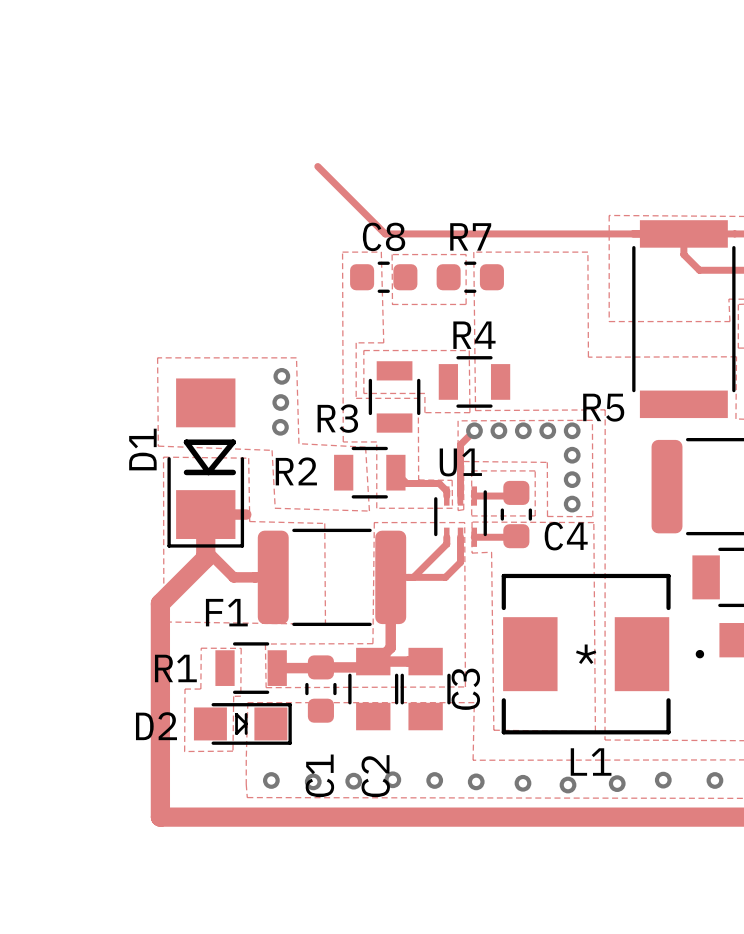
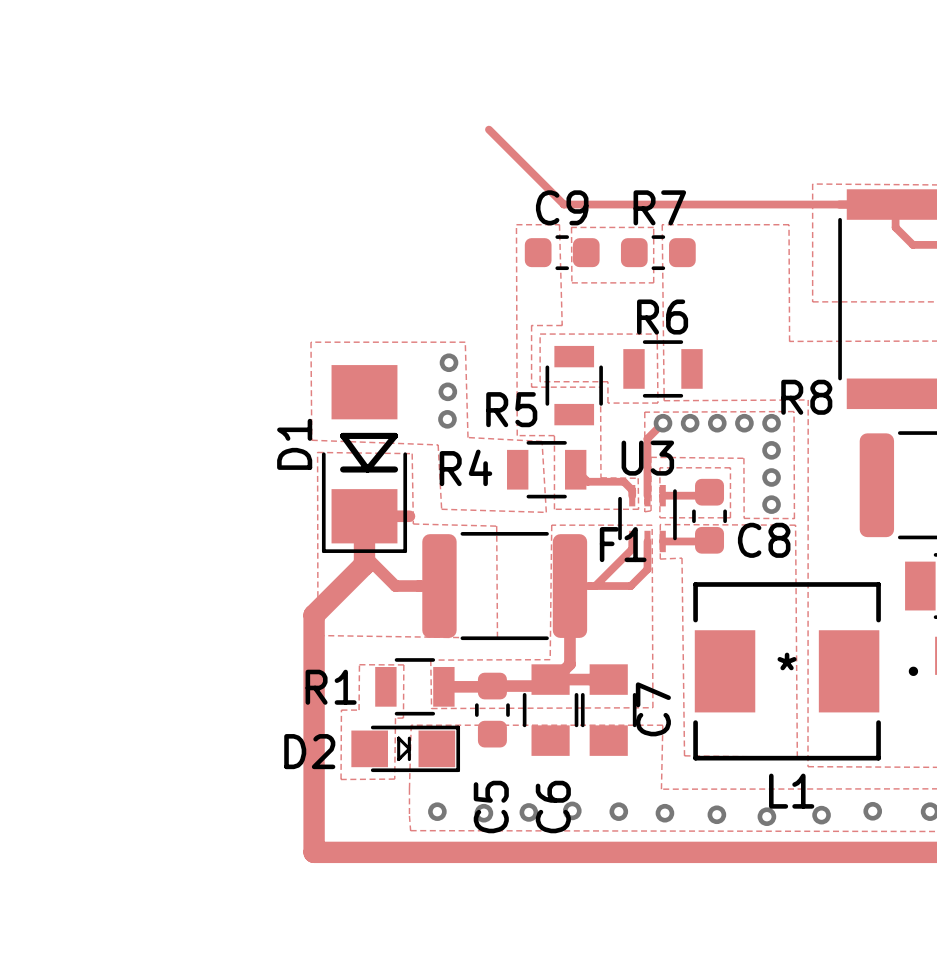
C8 name: C8 (384, 236) -> C9 (562, 207)
R4 name: R4 (474, 335) -> R6 (662, 317)
R5 name: R5 (603, 407) -> R8 (806, 397)
R3 name: R3 (337, 418) -> R5 (511, 409)
U1 name: U1 (460, 462) -> U3 (647, 458)
R2 name: R2 (296, 471) -> R4 (465, 467)
C4 name: C4 (566, 536) -> C8 (764, 540)
F1 name position: F1 (226, 612) -> F1 (623, 544)
C3 name: C3 (465, 689) -> C7 (653, 709)
C1 name: C1 (319, 775) -> C5 (491, 807)
C2 name: C2 (375, 776) -> C6 (553, 807)

